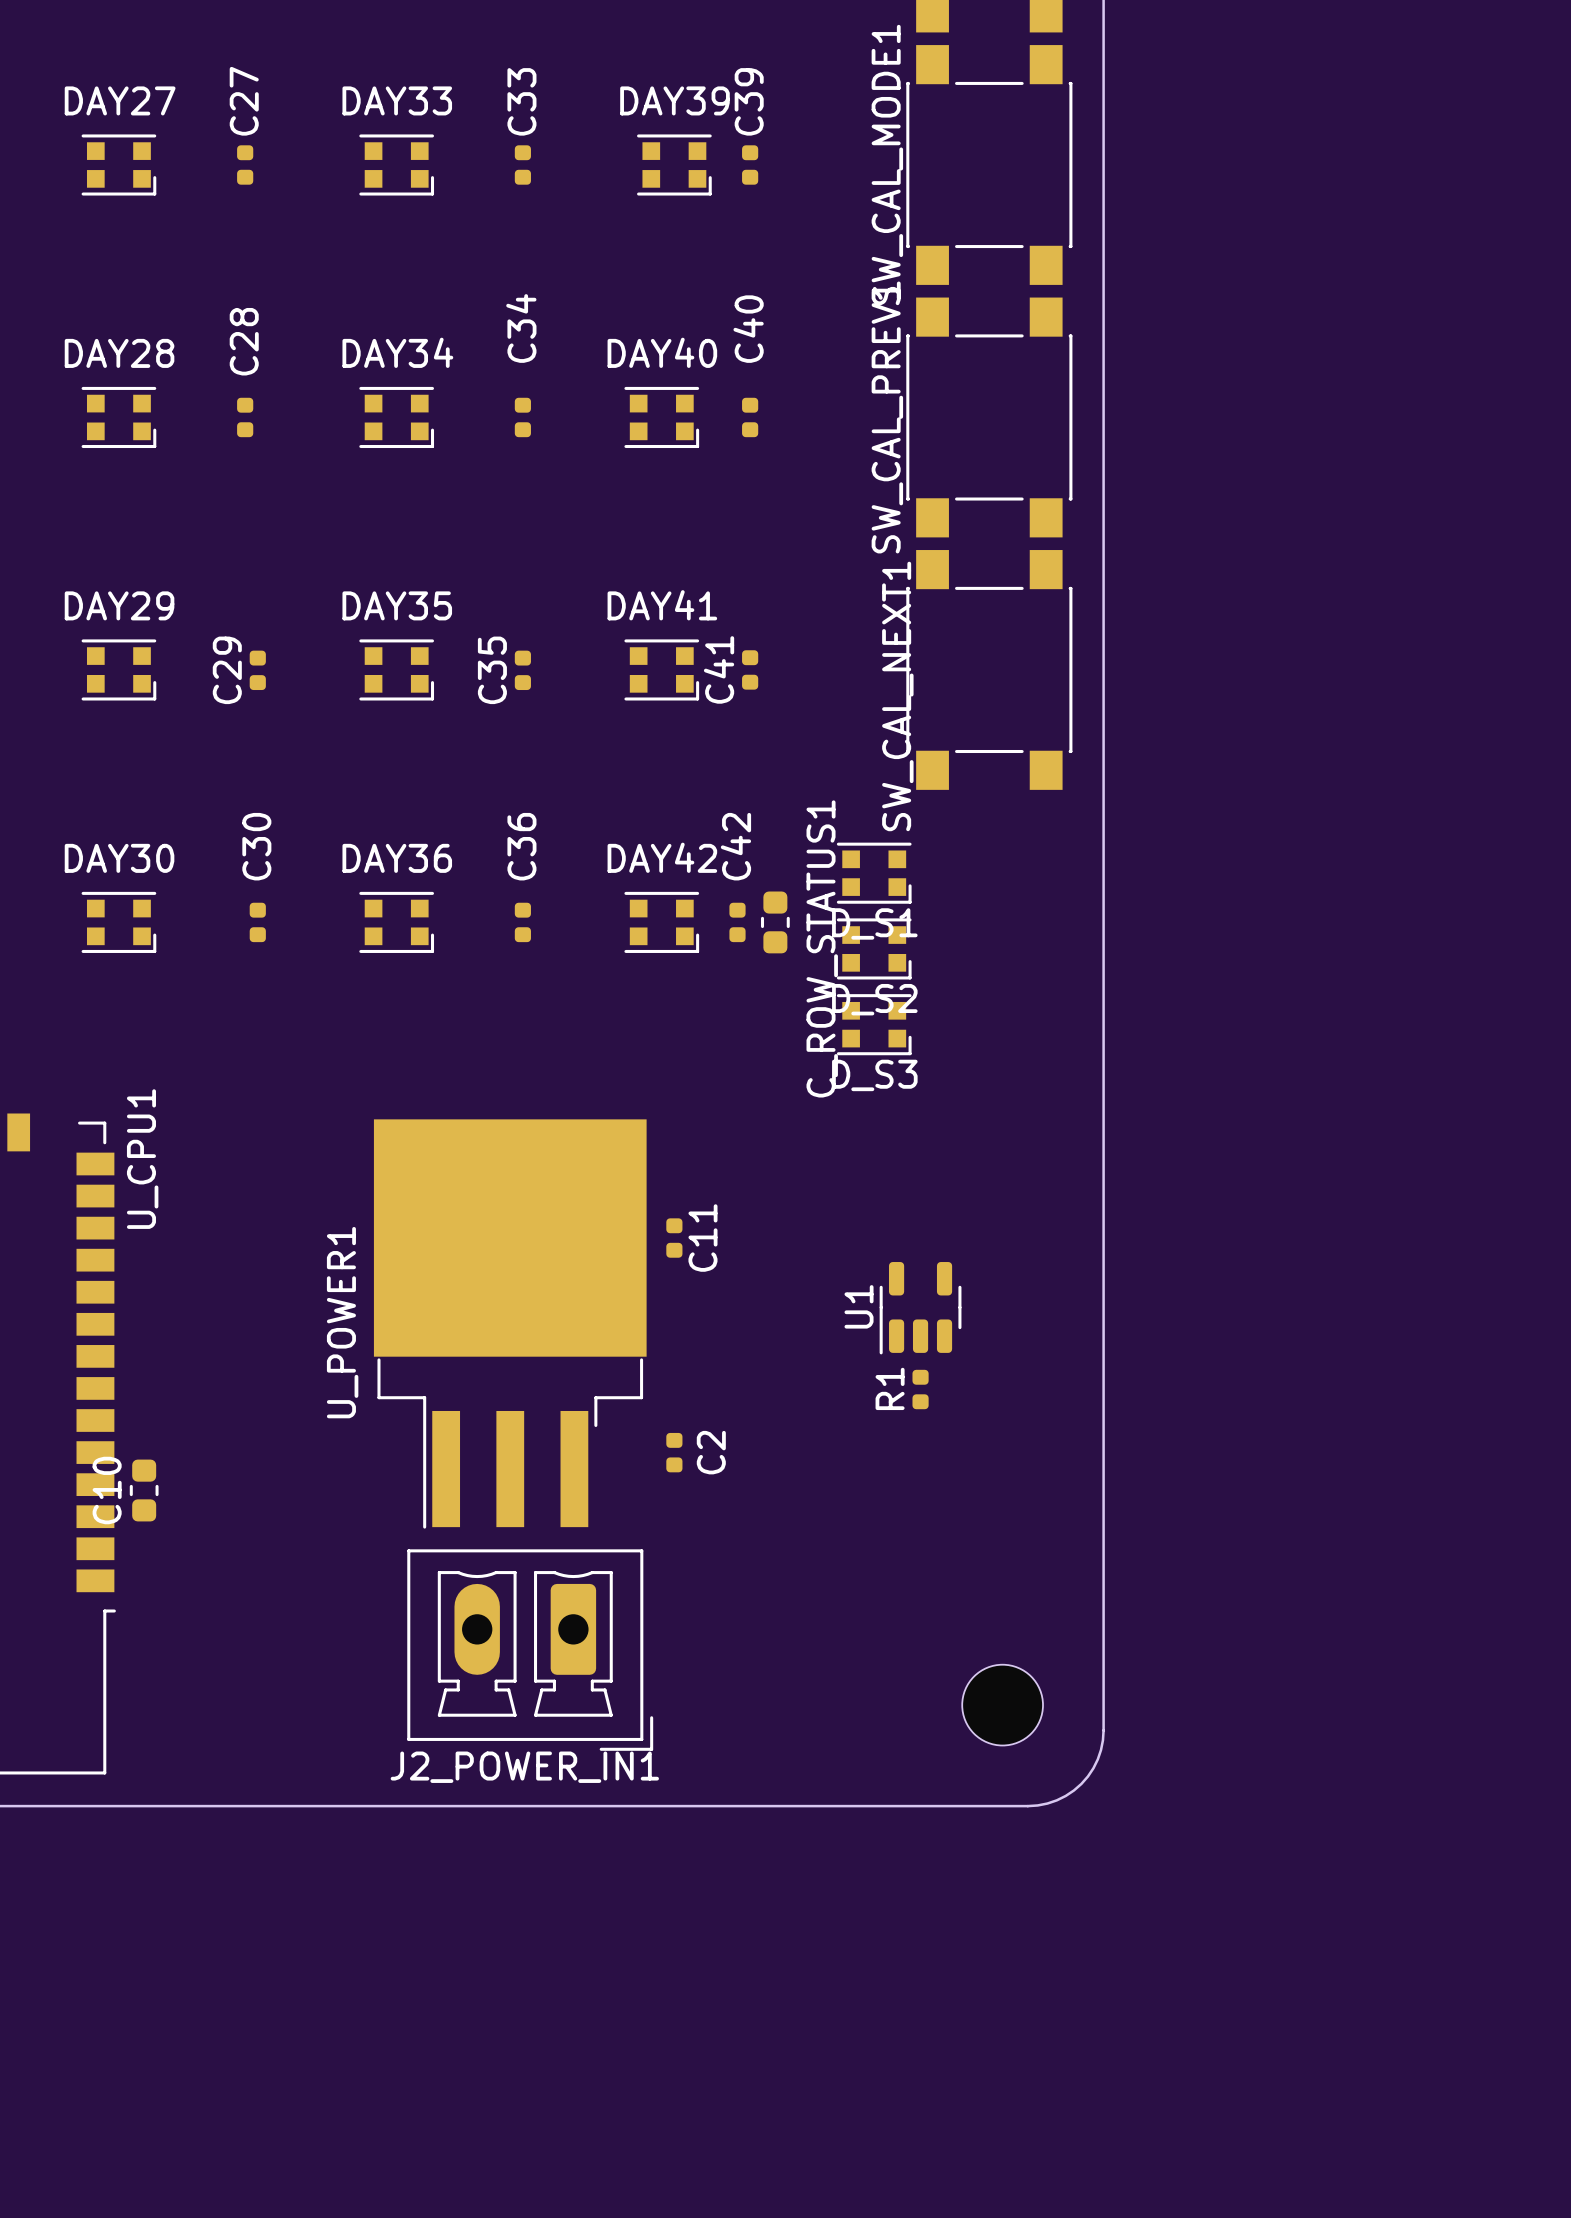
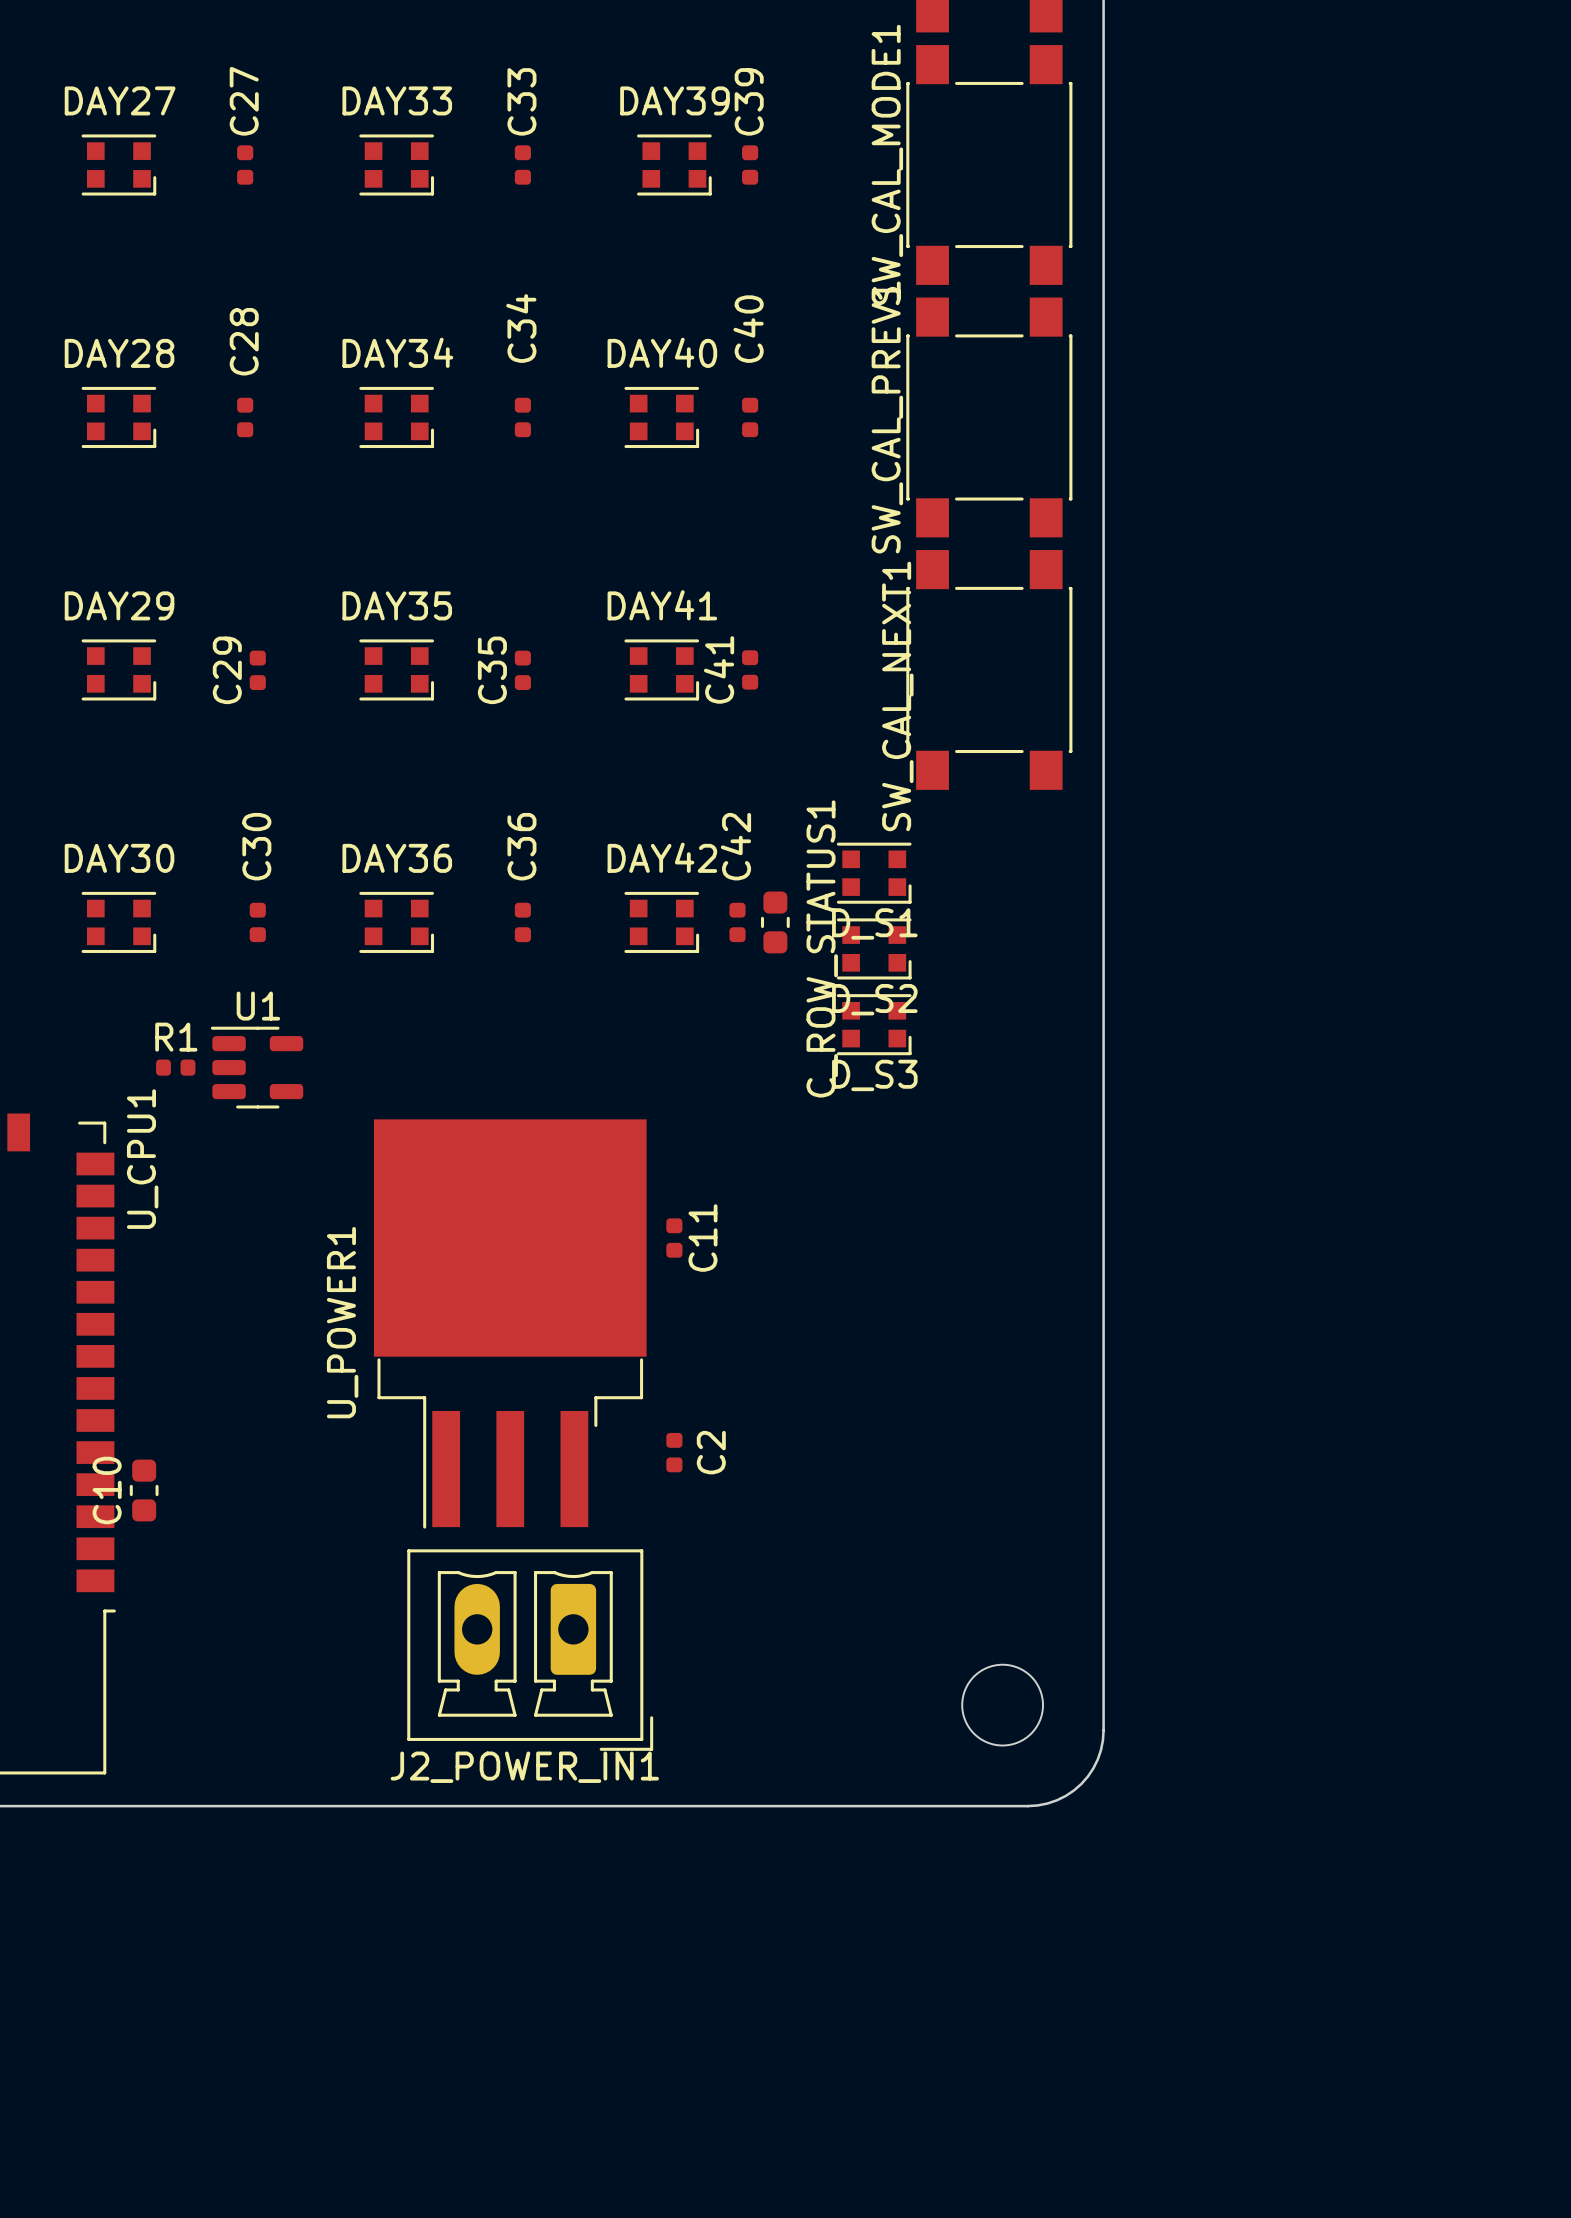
U1 rotation: 0° (920, 1308) -> 90° clockwise (257, 1067)
U1 position: (920, 1308) -> (257, 1067)
R1 rotation: 0° (920, 1389) -> 90° clockwise (175, 1067)
R1 position: (920, 1389) -> (175, 1067)

